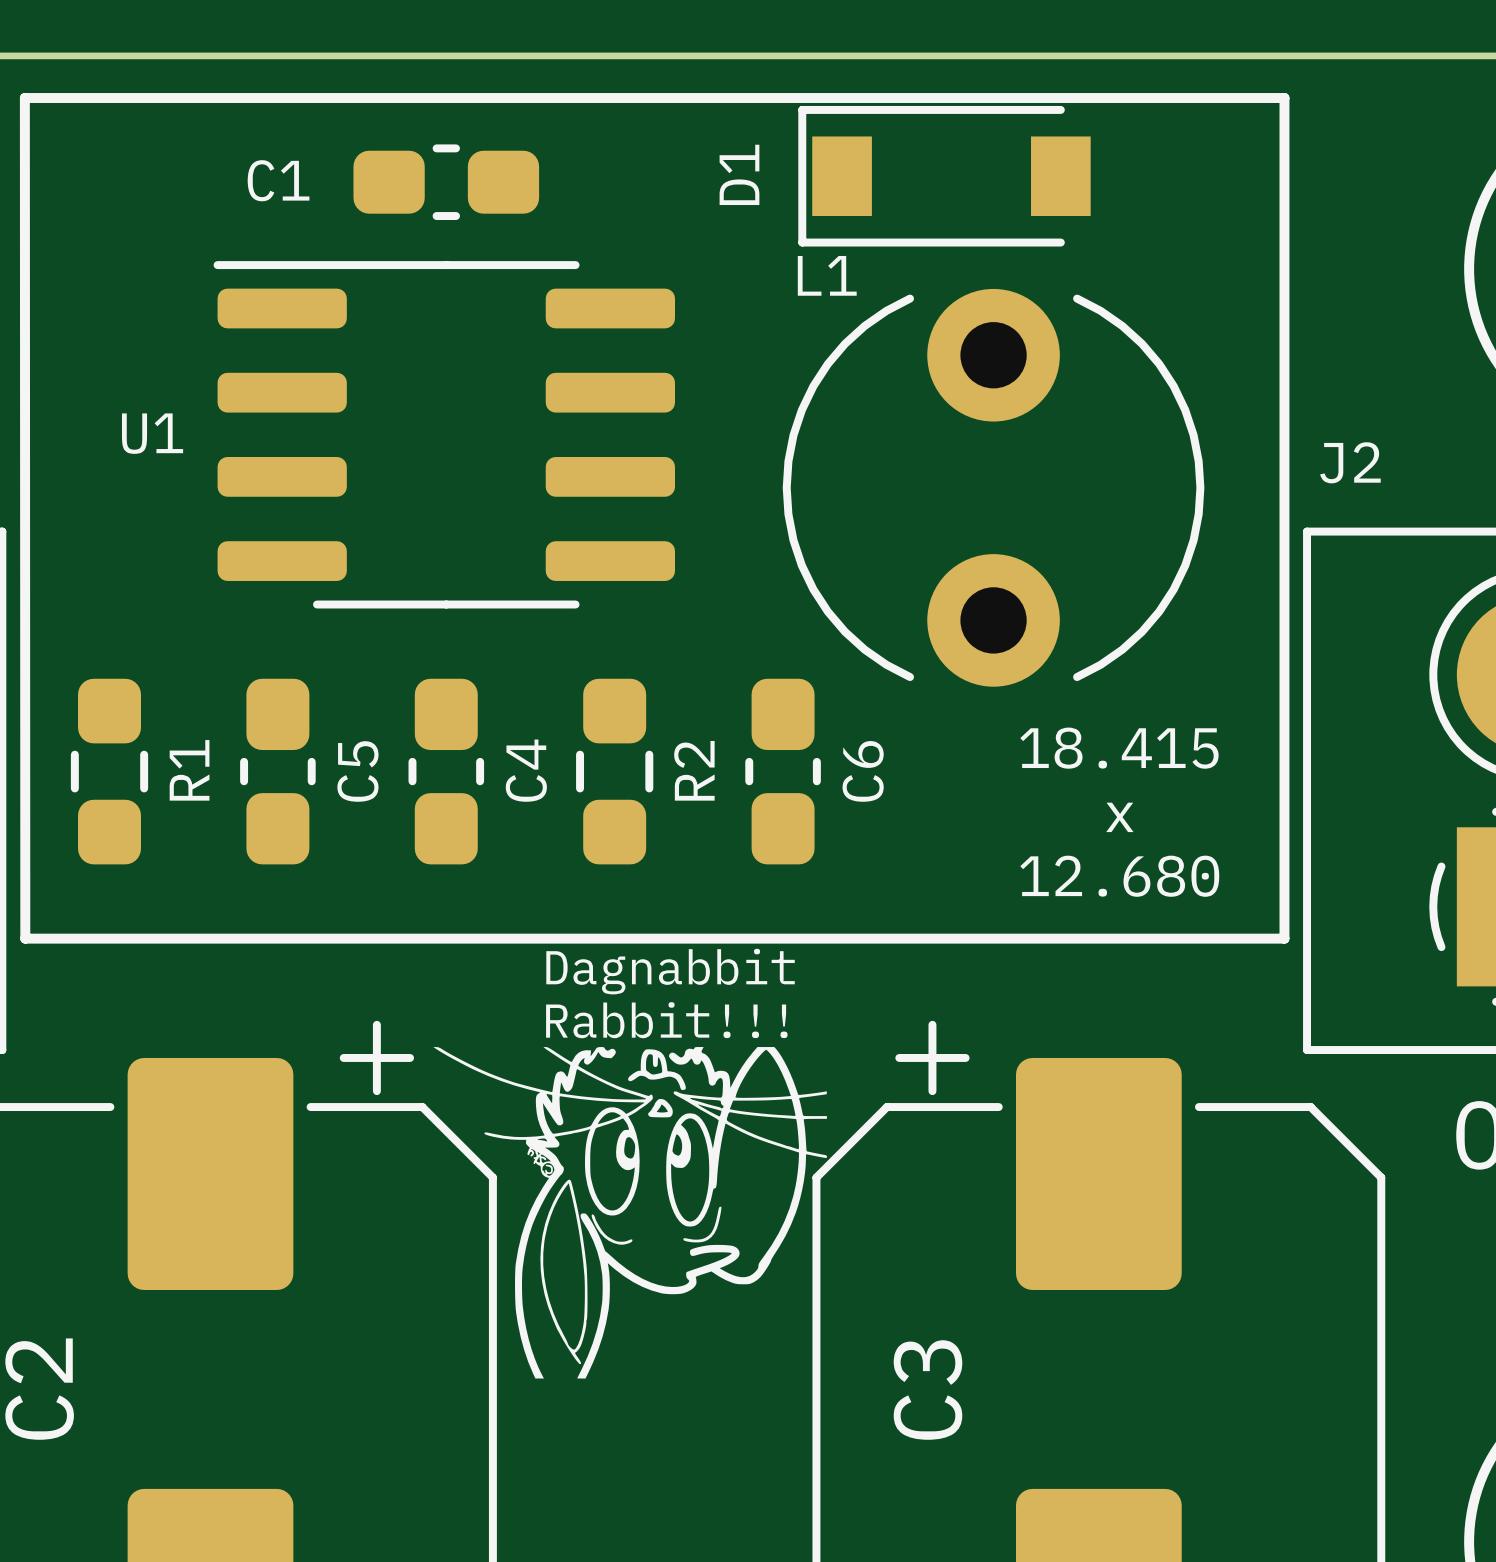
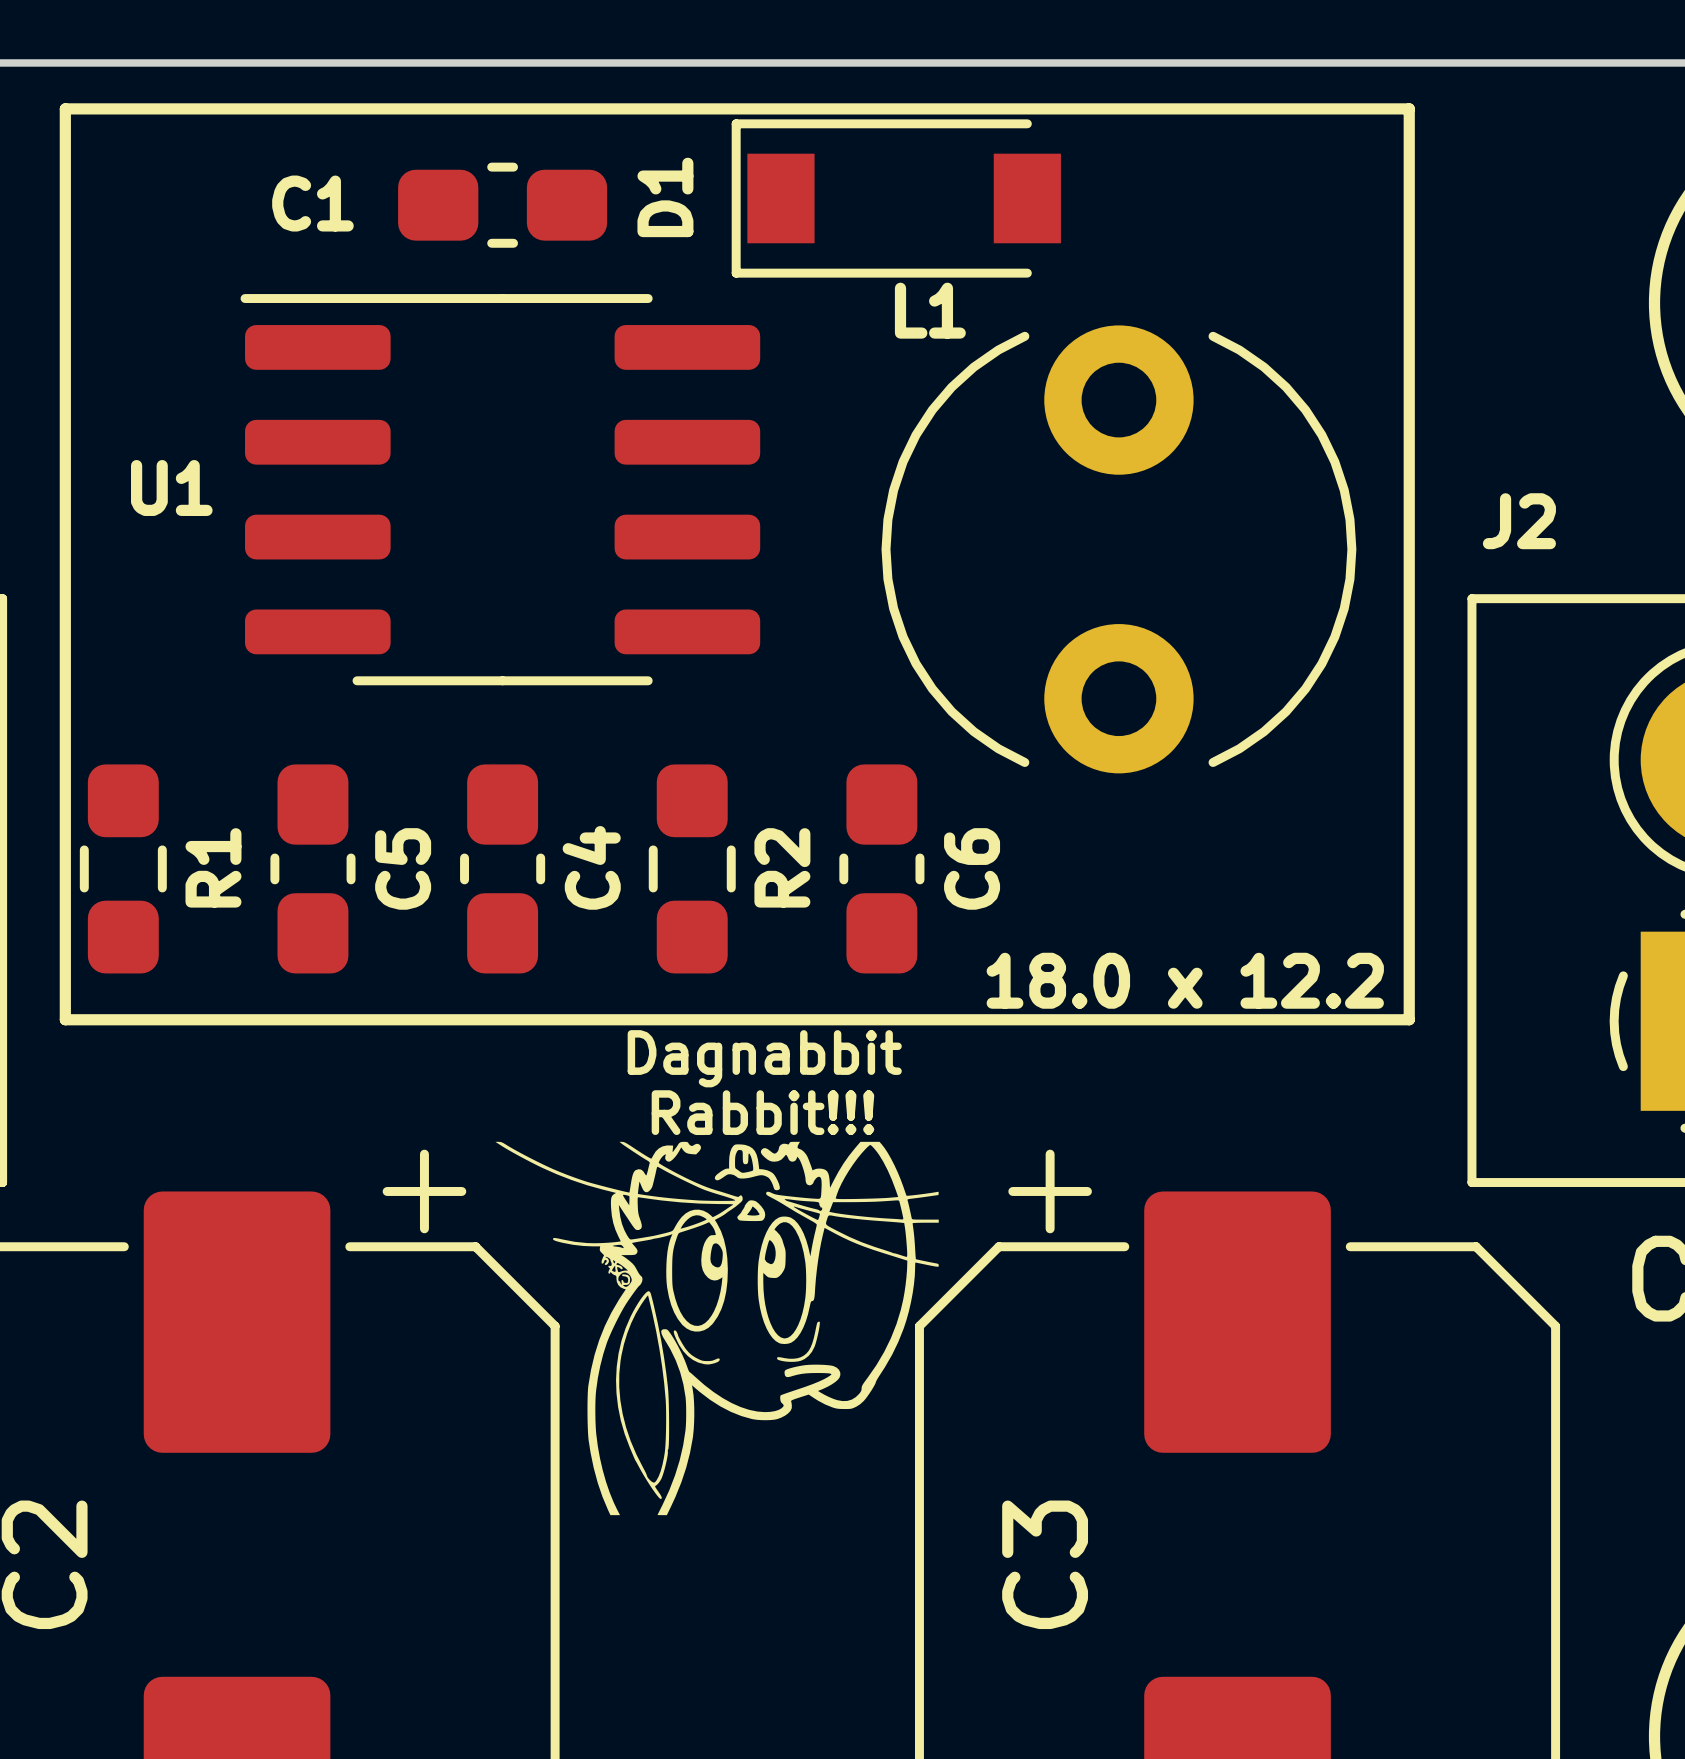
line: (24, 98) (1284, 98) (1284, 938) (25, 938) (24, 98) -> (65, 108) (65, 1019) (1409, 1019) (1409, 108) (65, 108)
D1 position: (944, 176) -> (896, 198)
text: 18.415 (1119, 748) -> none
text: x (1119, 817) -> none
text: none -> 18.0 x 12.2 (1185, 980)
text: 12.680 (1119, 876) -> none
drawing position: (630, 1212) -> (717, 1328)

